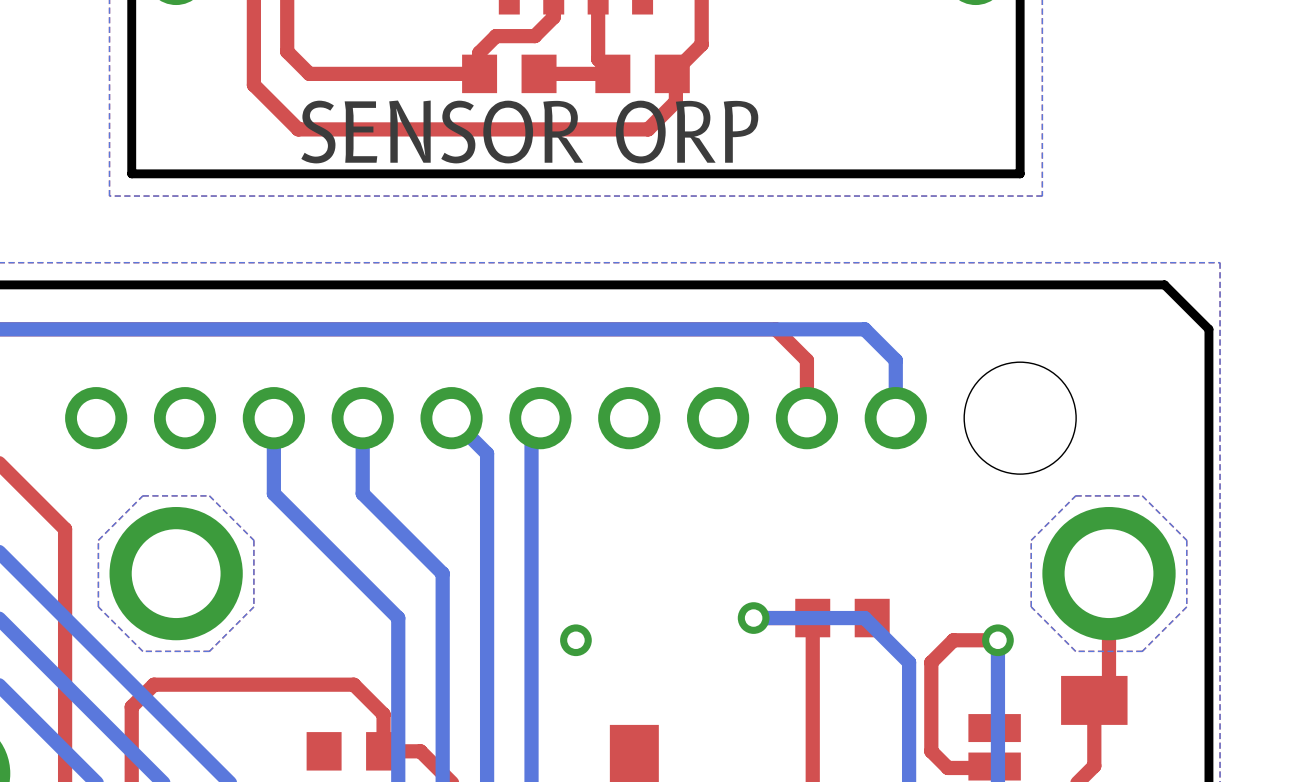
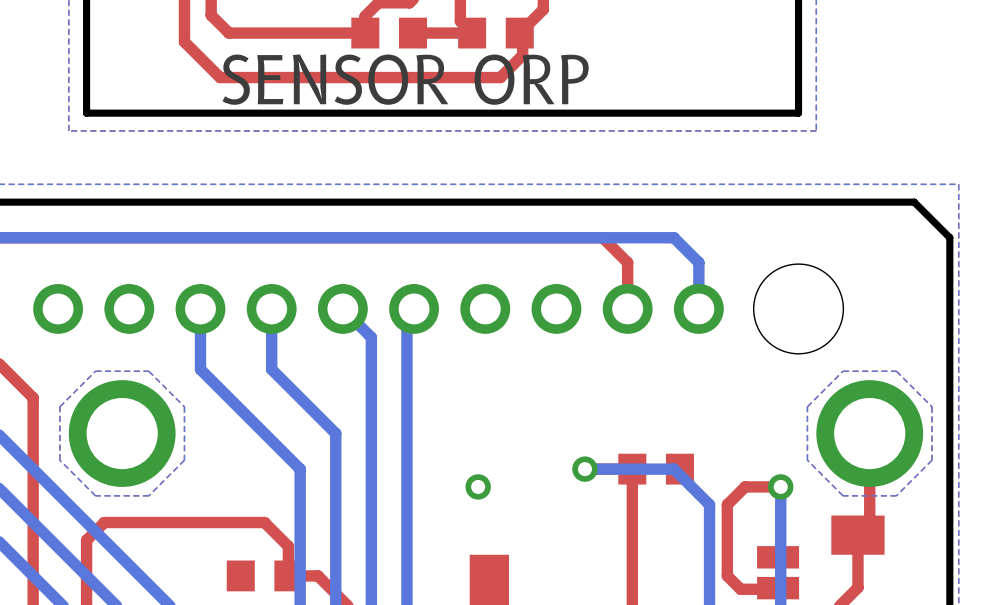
via position: (575, 640) -> (478, 486)

